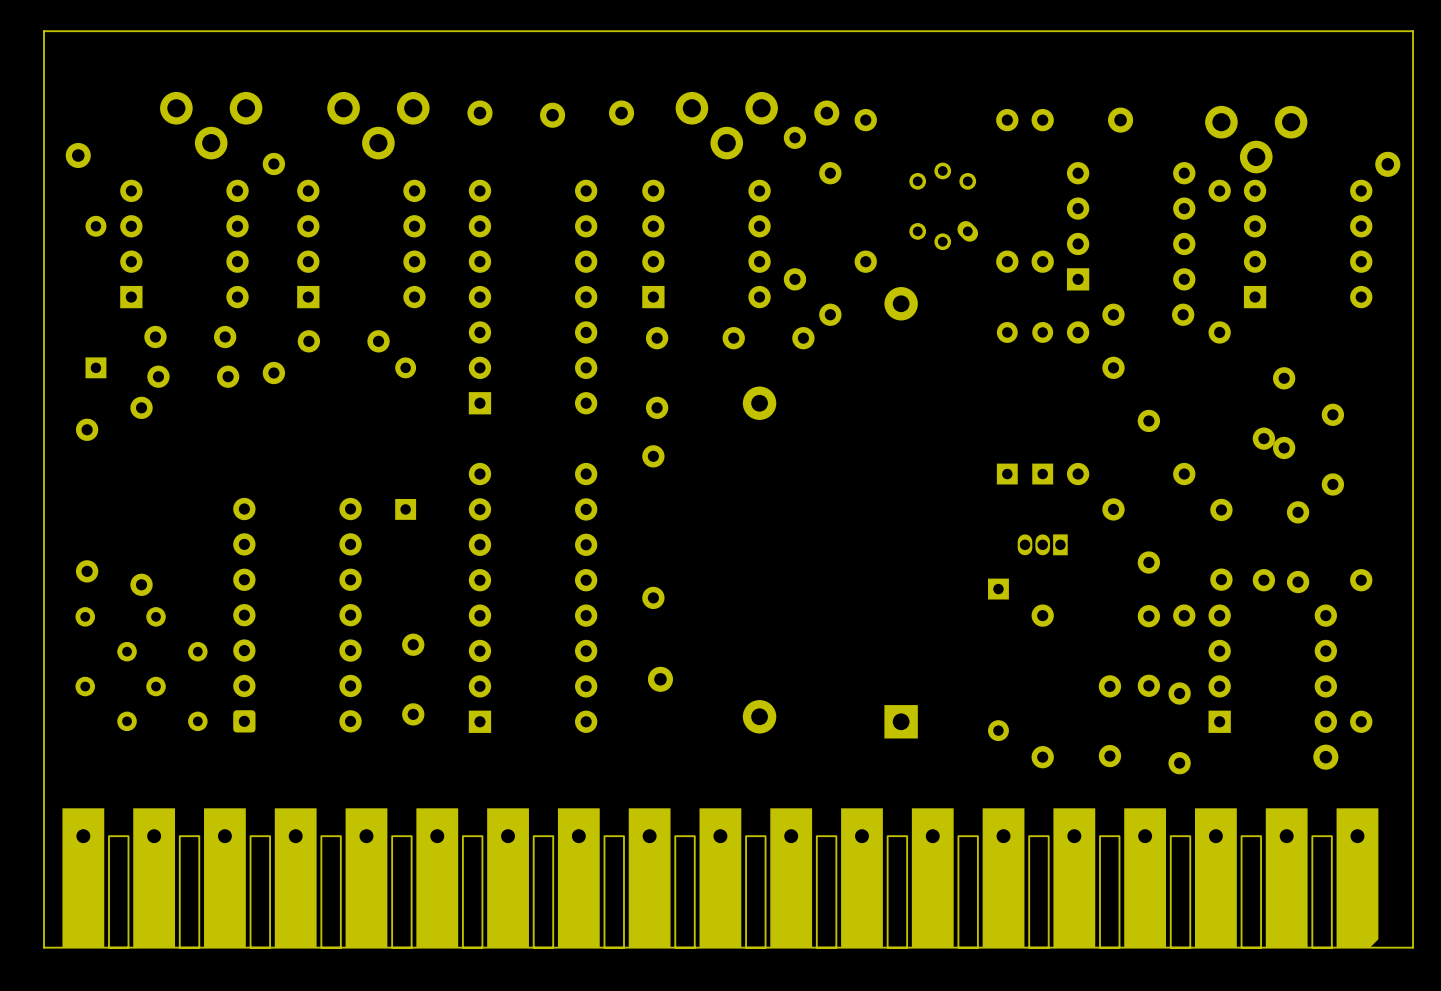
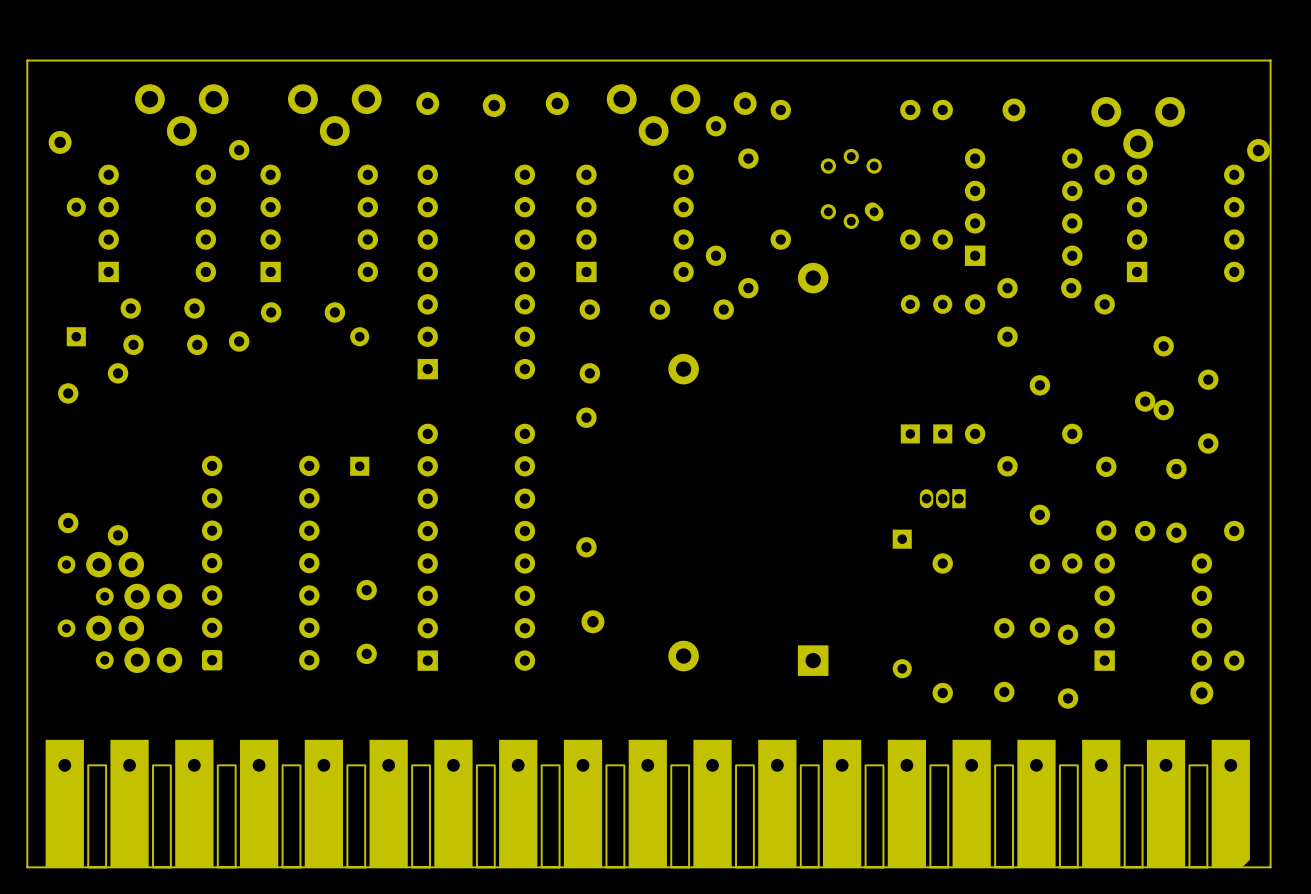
part: none -> (115, 564)
part: none -> (153, 596)
part: none -> (115, 628)
part: none -> (153, 660)
board edge: (1400, 947) (1413, 947) (1413, 31) (44, 31) (44, 947) -> (1270, 867) (1270, 60) (27, 60) (28, 867)

